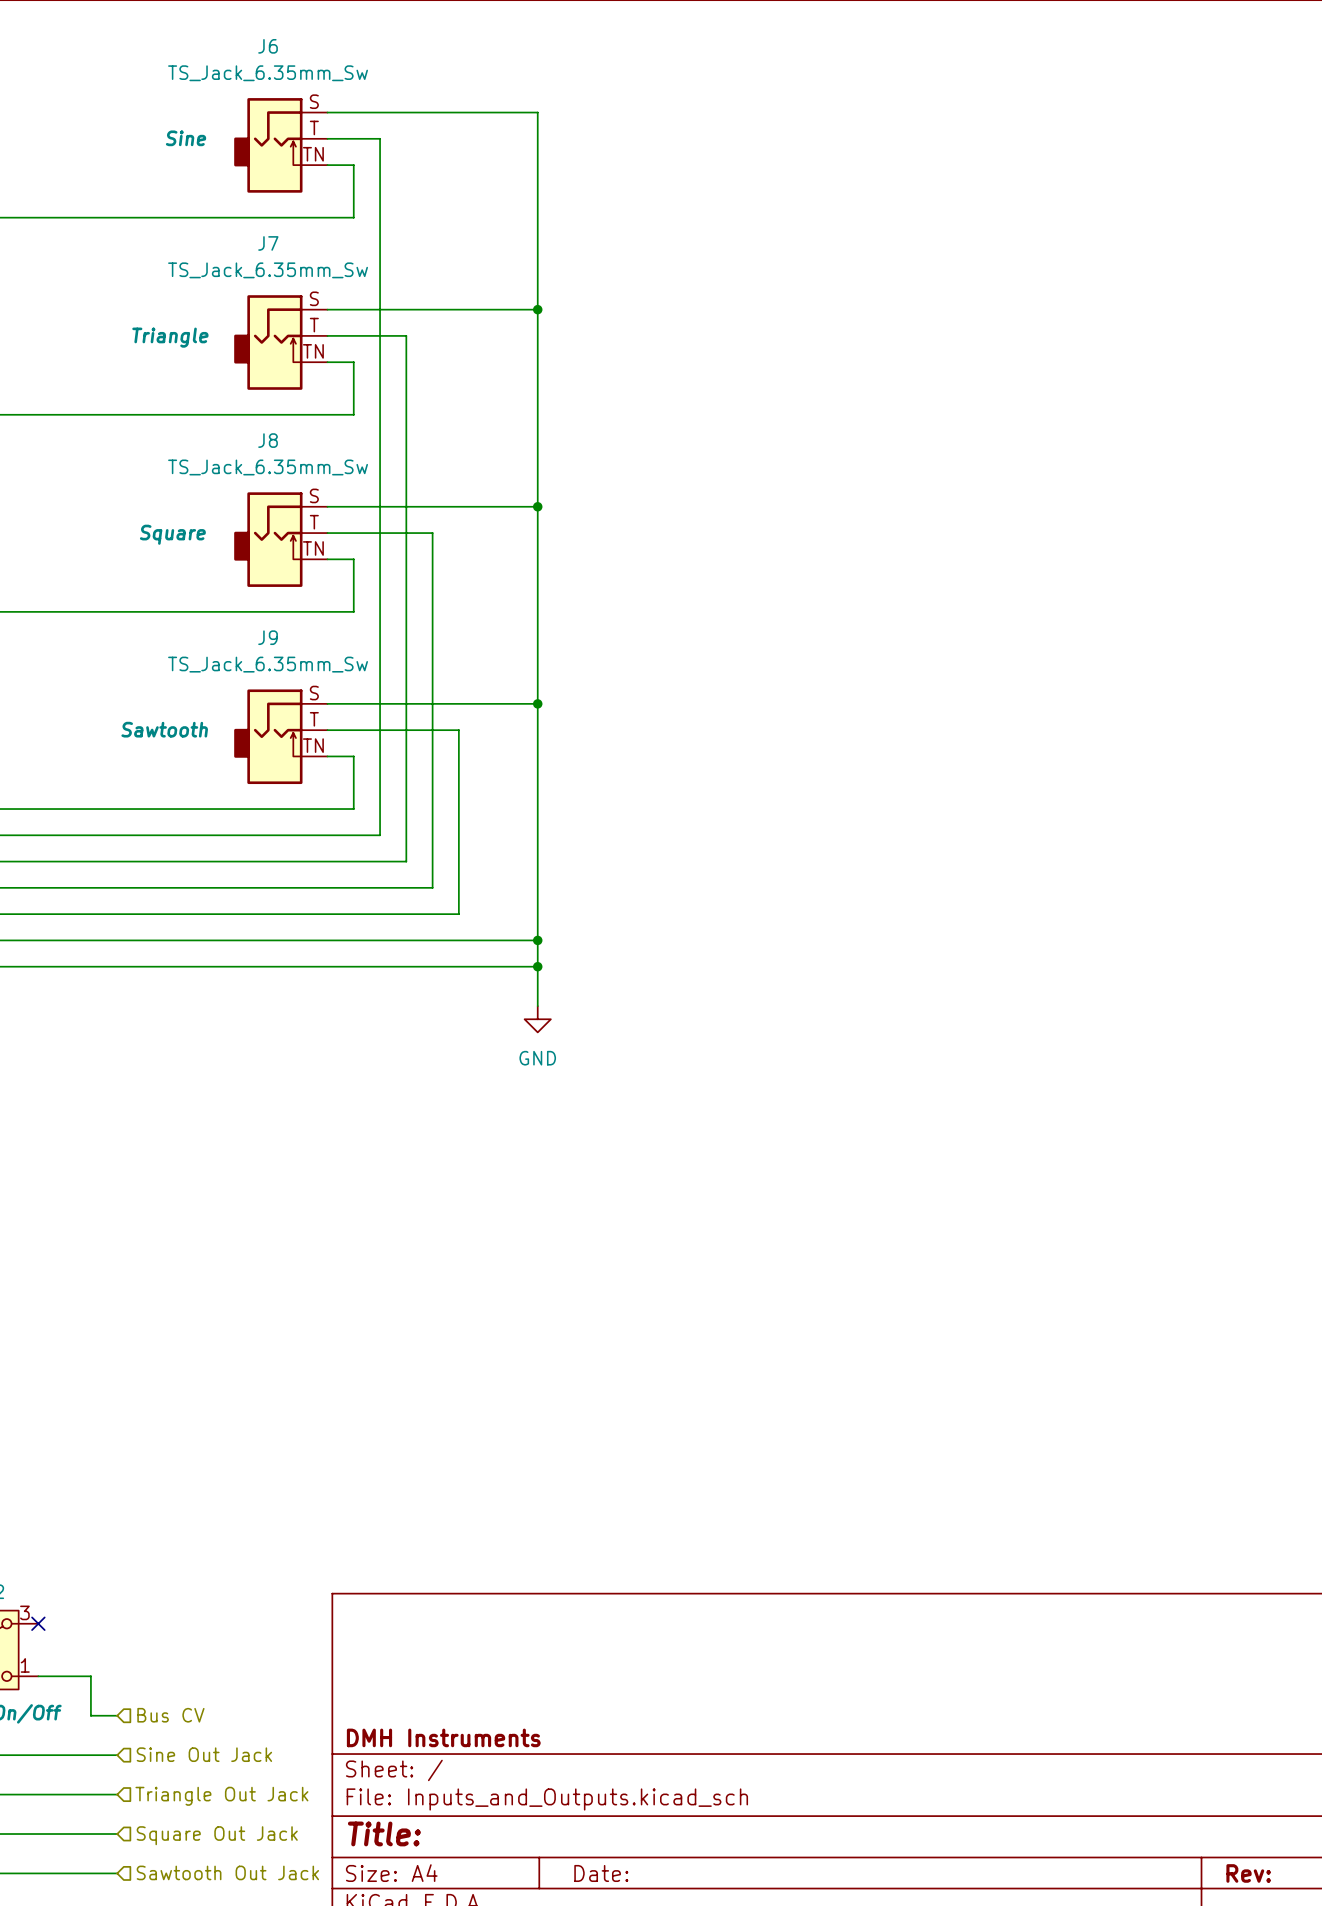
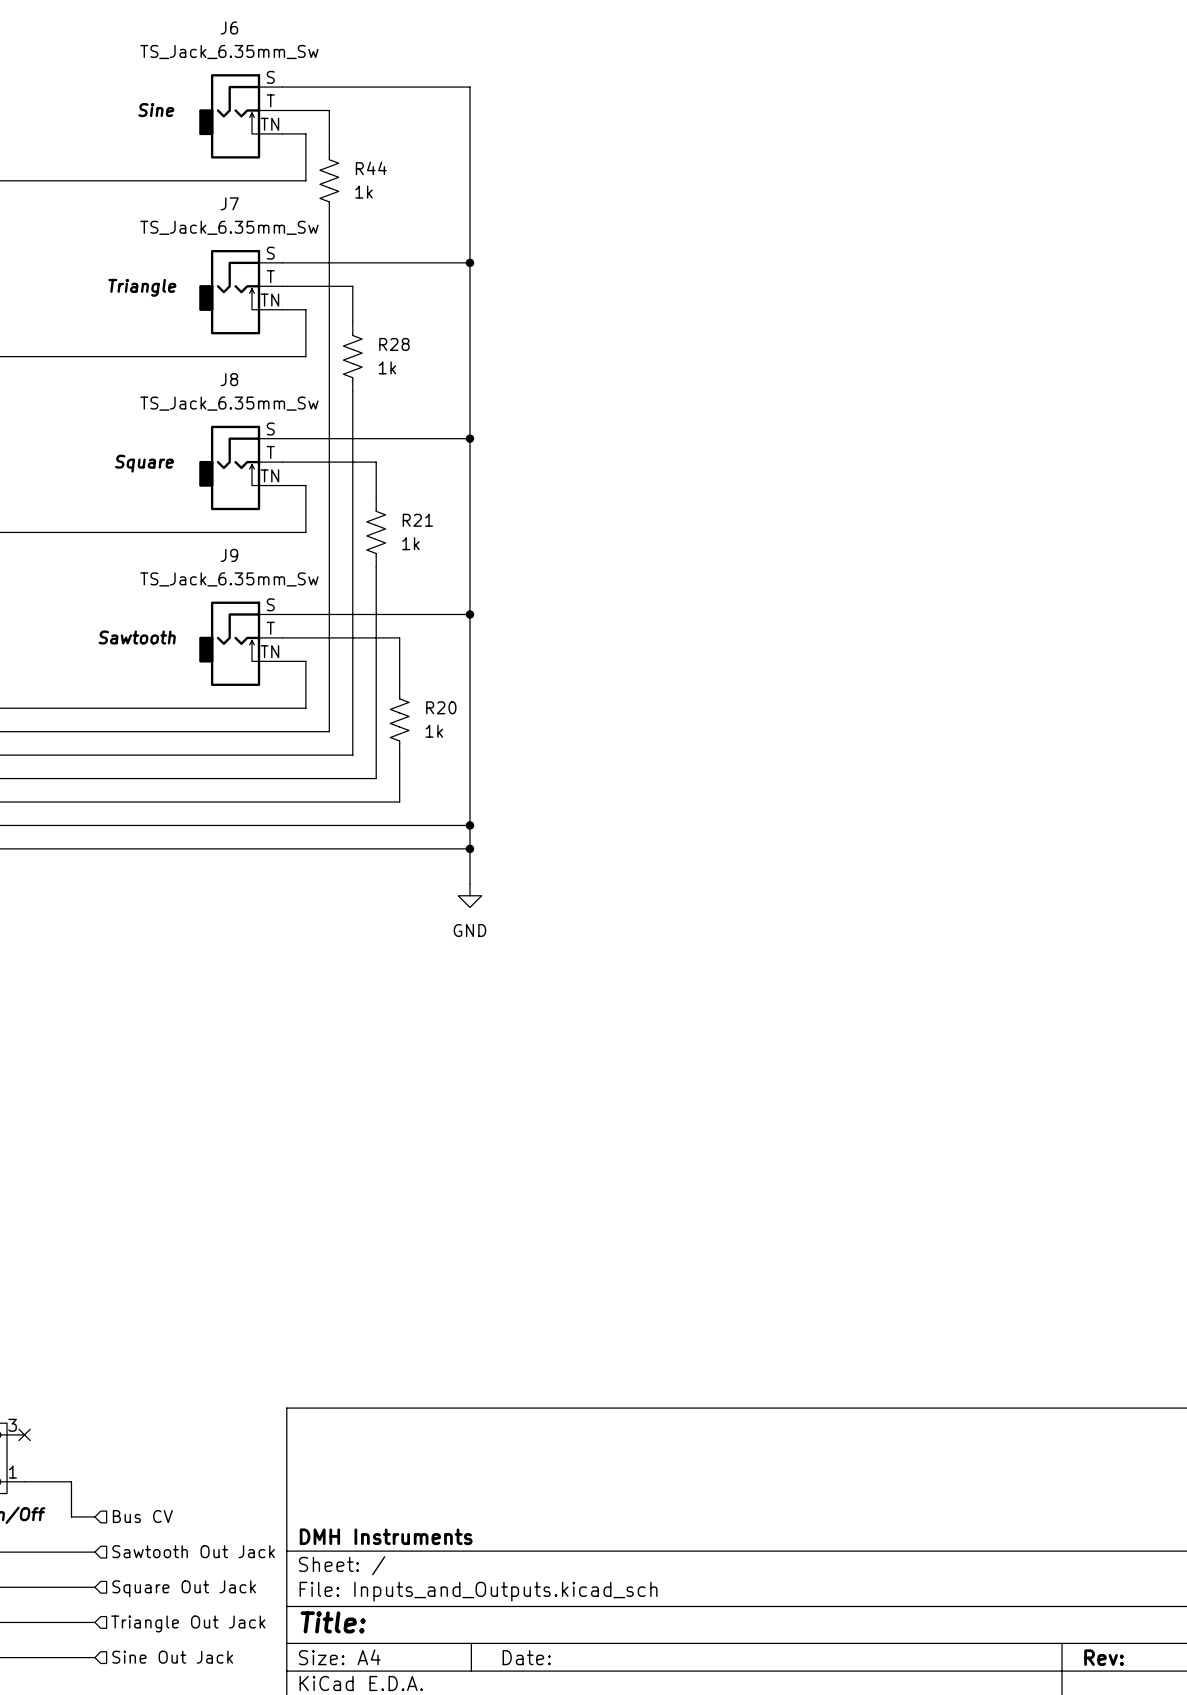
R44: none -> 1k (329, 180)
R28: none -> 1k (352, 356)
R21: none -> 1k (376, 532)
R20: none -> 1k (399, 719)
hierarchical label: Sine Out Jack (204, 1754) -> Sawtooth Out Jack (193, 1551)
hierarchical label: Triangle Out Jack (221, 1796) -> Square Out Jack (184, 1588)
hierarchical label: Square Out Jack (217, 1835) -> Triangle Out Jack (188, 1623)
hierarchical label: Sawtooth Out Jack (227, 1872) -> Sine Out Jack (172, 1657)

